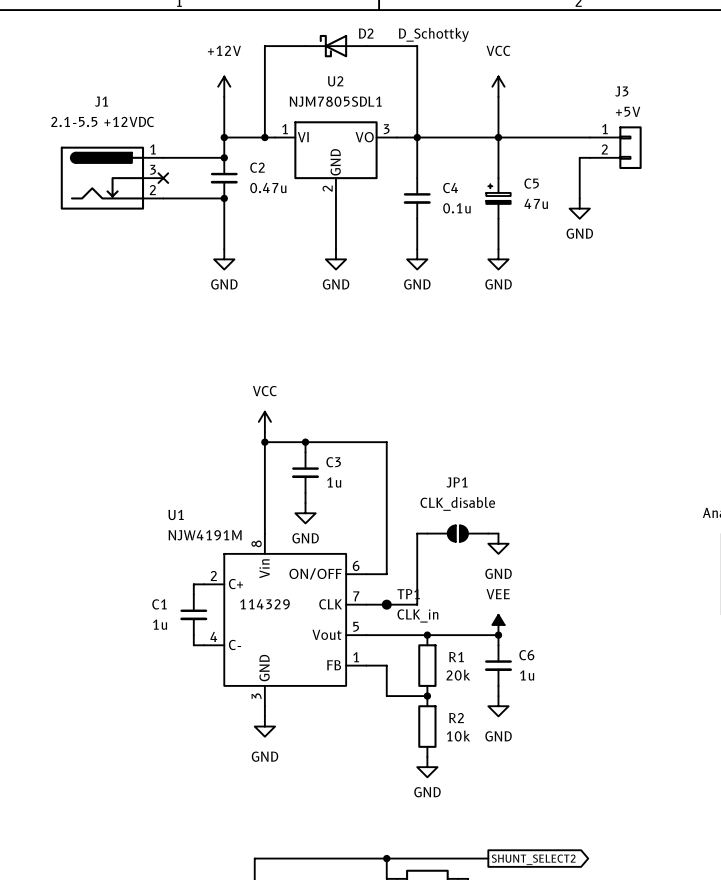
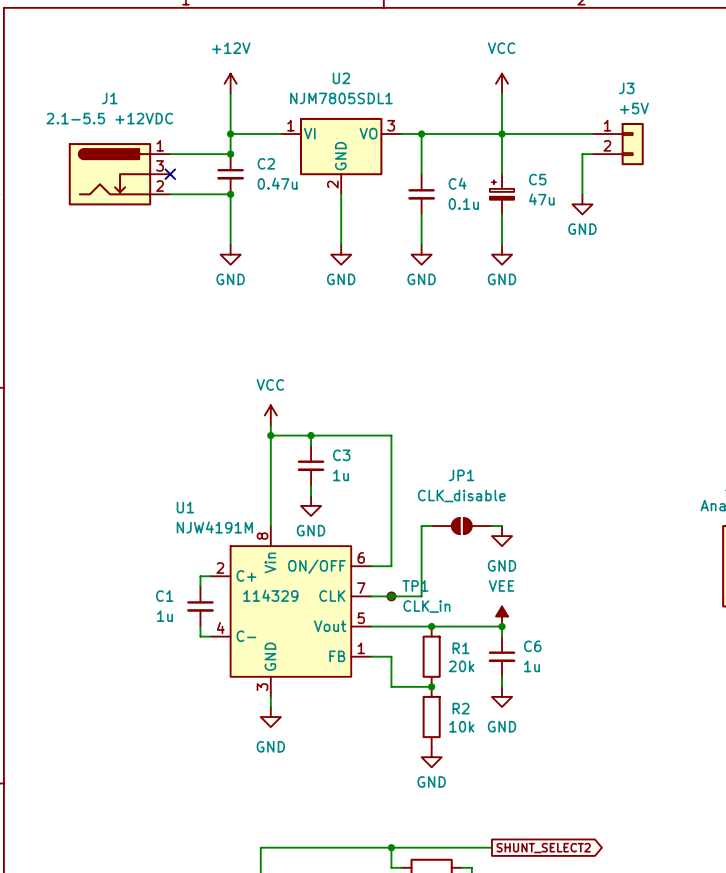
wire: (305, 46) (264, 46) (264, 137) -> none
D2: D_Schottky (335, 46) -> none
wire: (366, 46) (417, 46) (417, 137) -> none
junction: (264, 137) -> none

